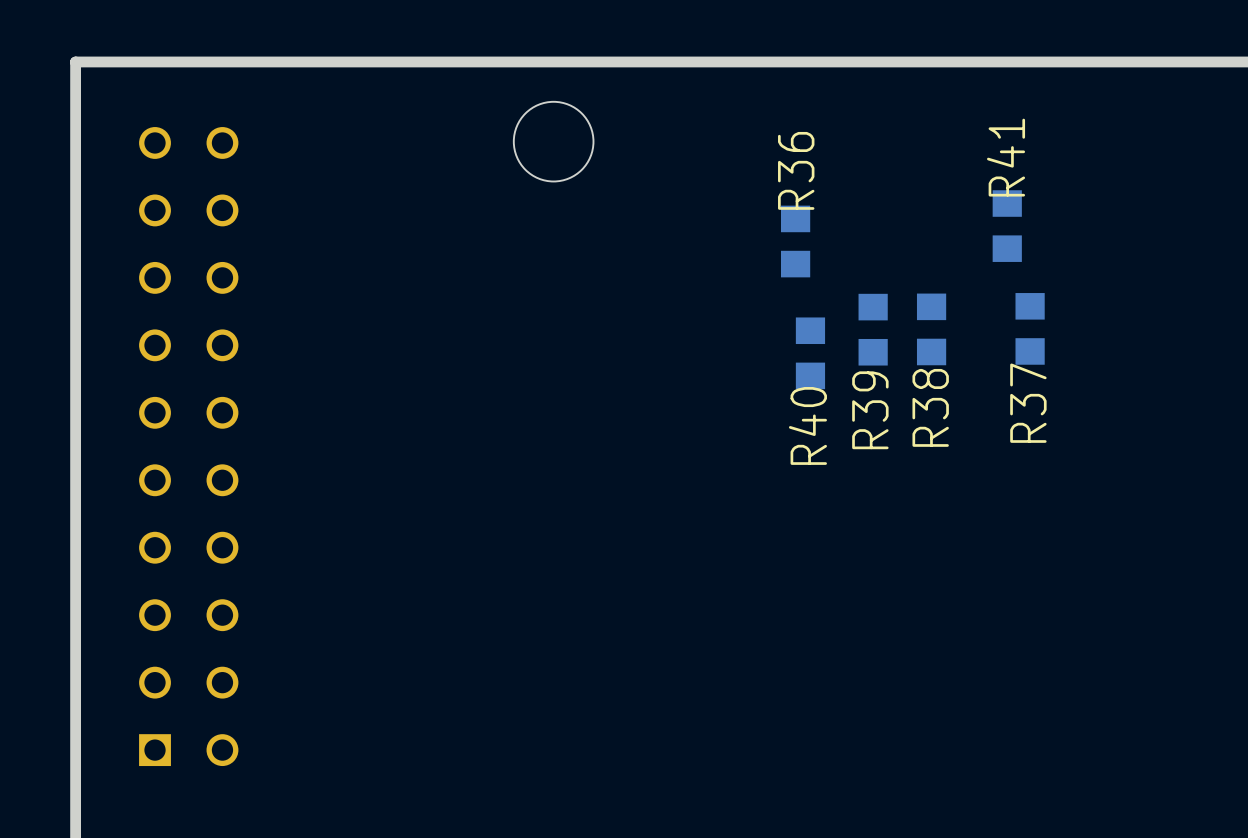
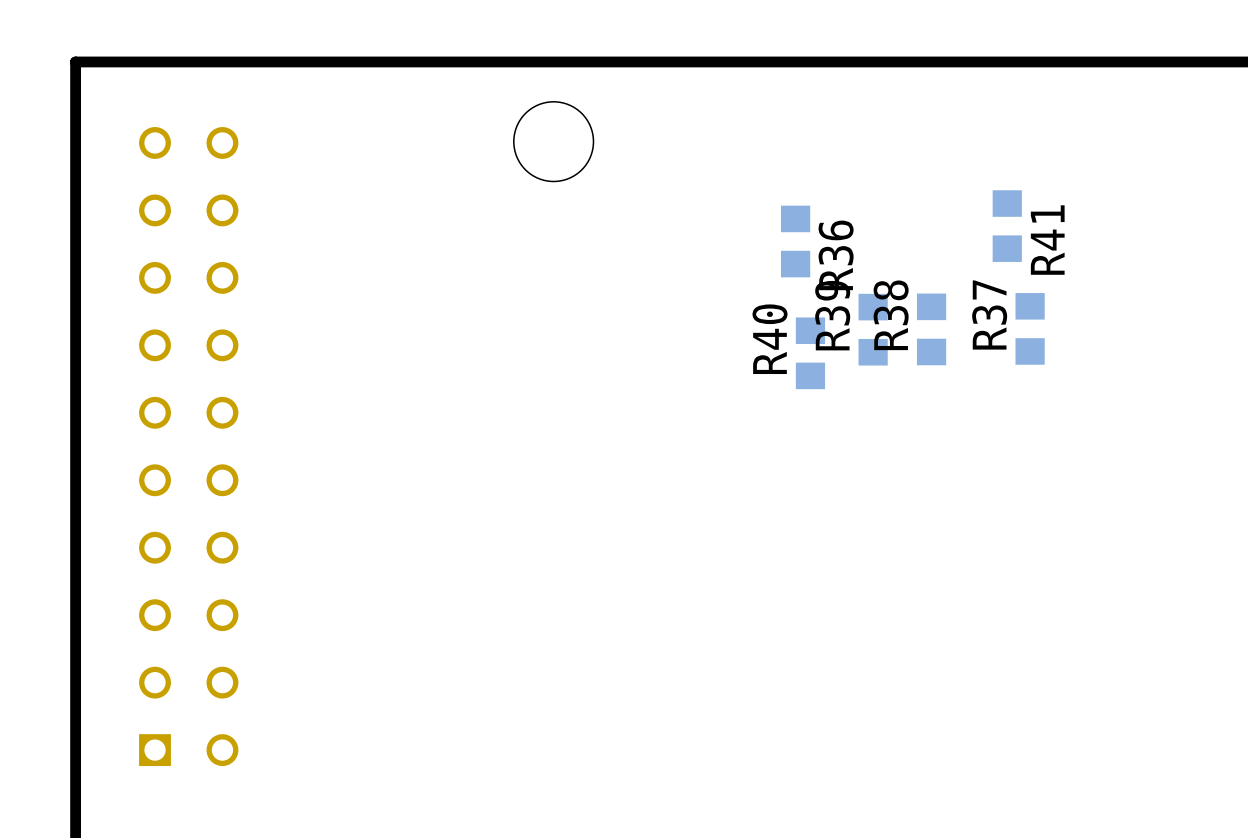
R41 name position: R41 (1006, 157) -> R41 (1047, 240)
R36 name position: R36 (796, 170) -> R36 (836, 255)
R37 name position: R37 (1028, 403) -> R37 (989, 315)
R38 name position: R38 (930, 407) -> R38 (891, 315)
R39 name position: R39 (870, 410) -> R39 (832, 315)
R40 name position: R40 (807, 425) -> R40 (770, 339)

